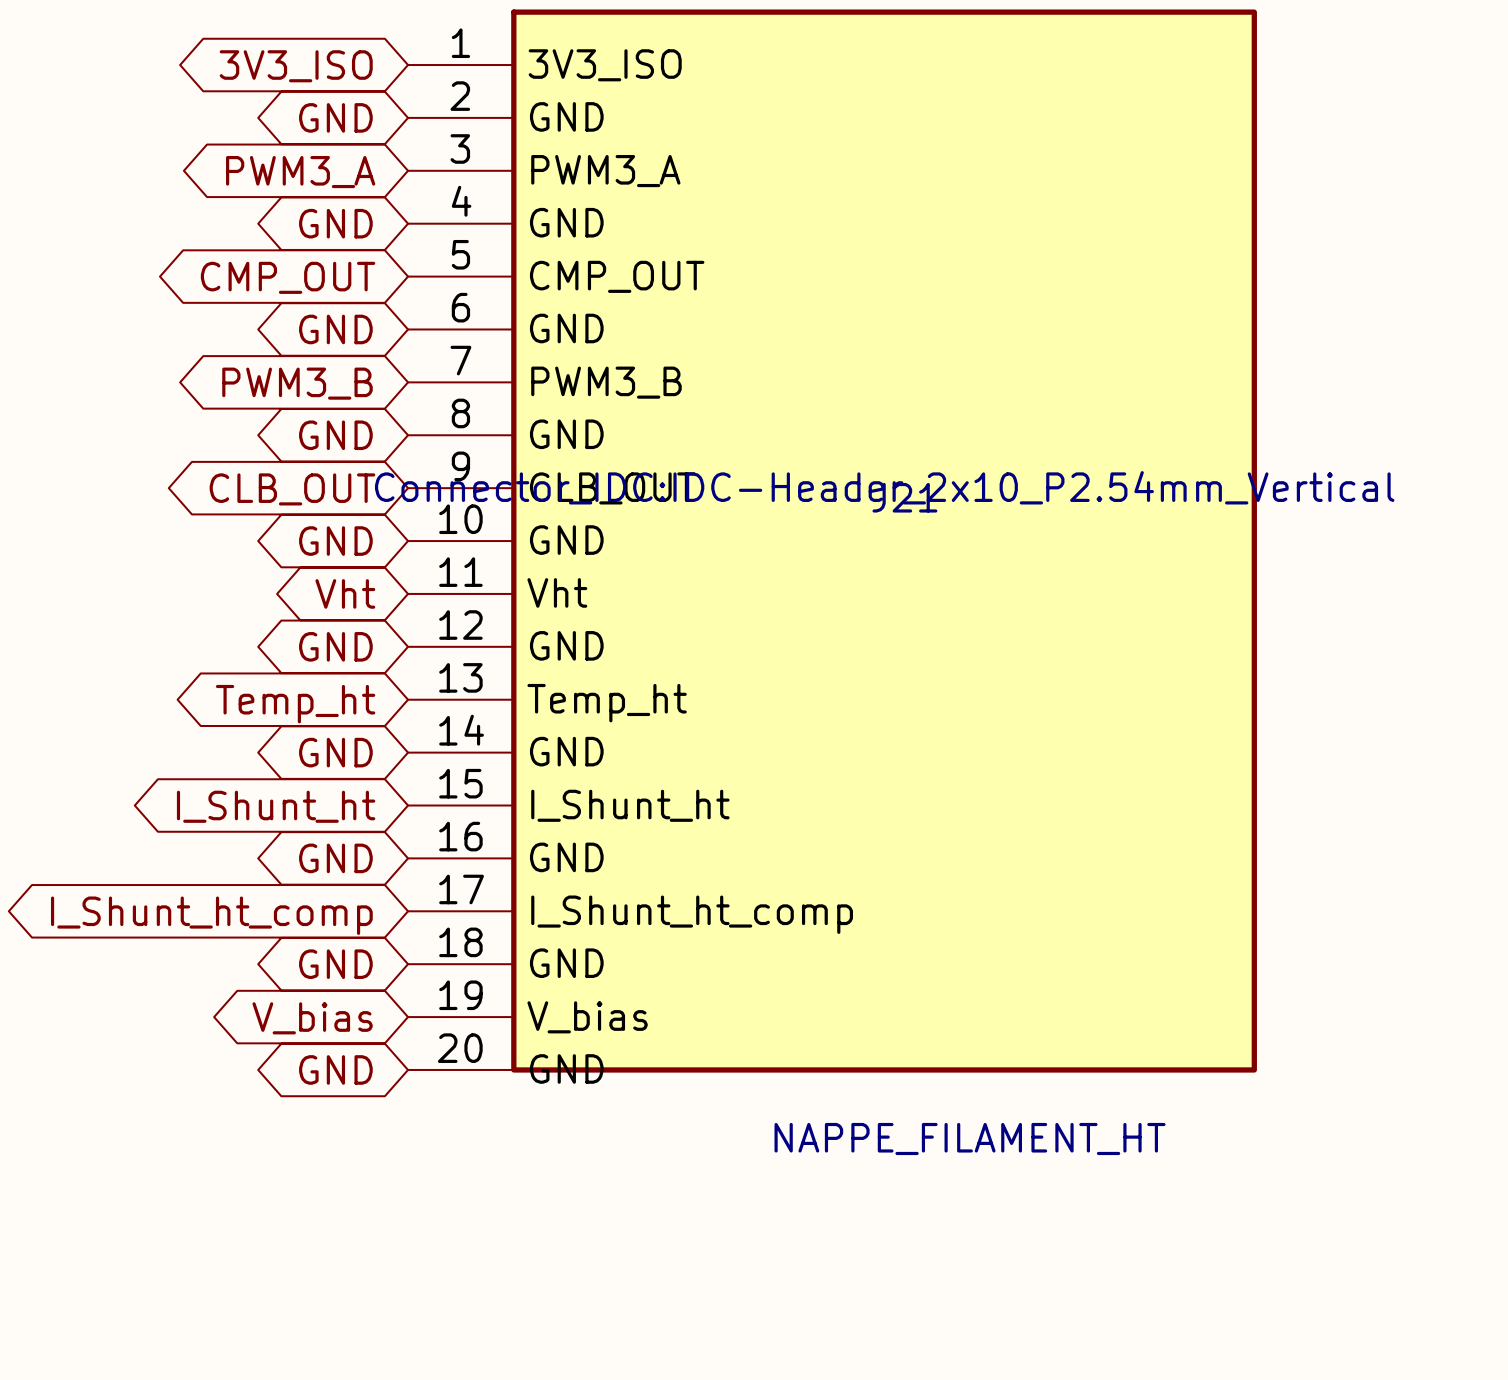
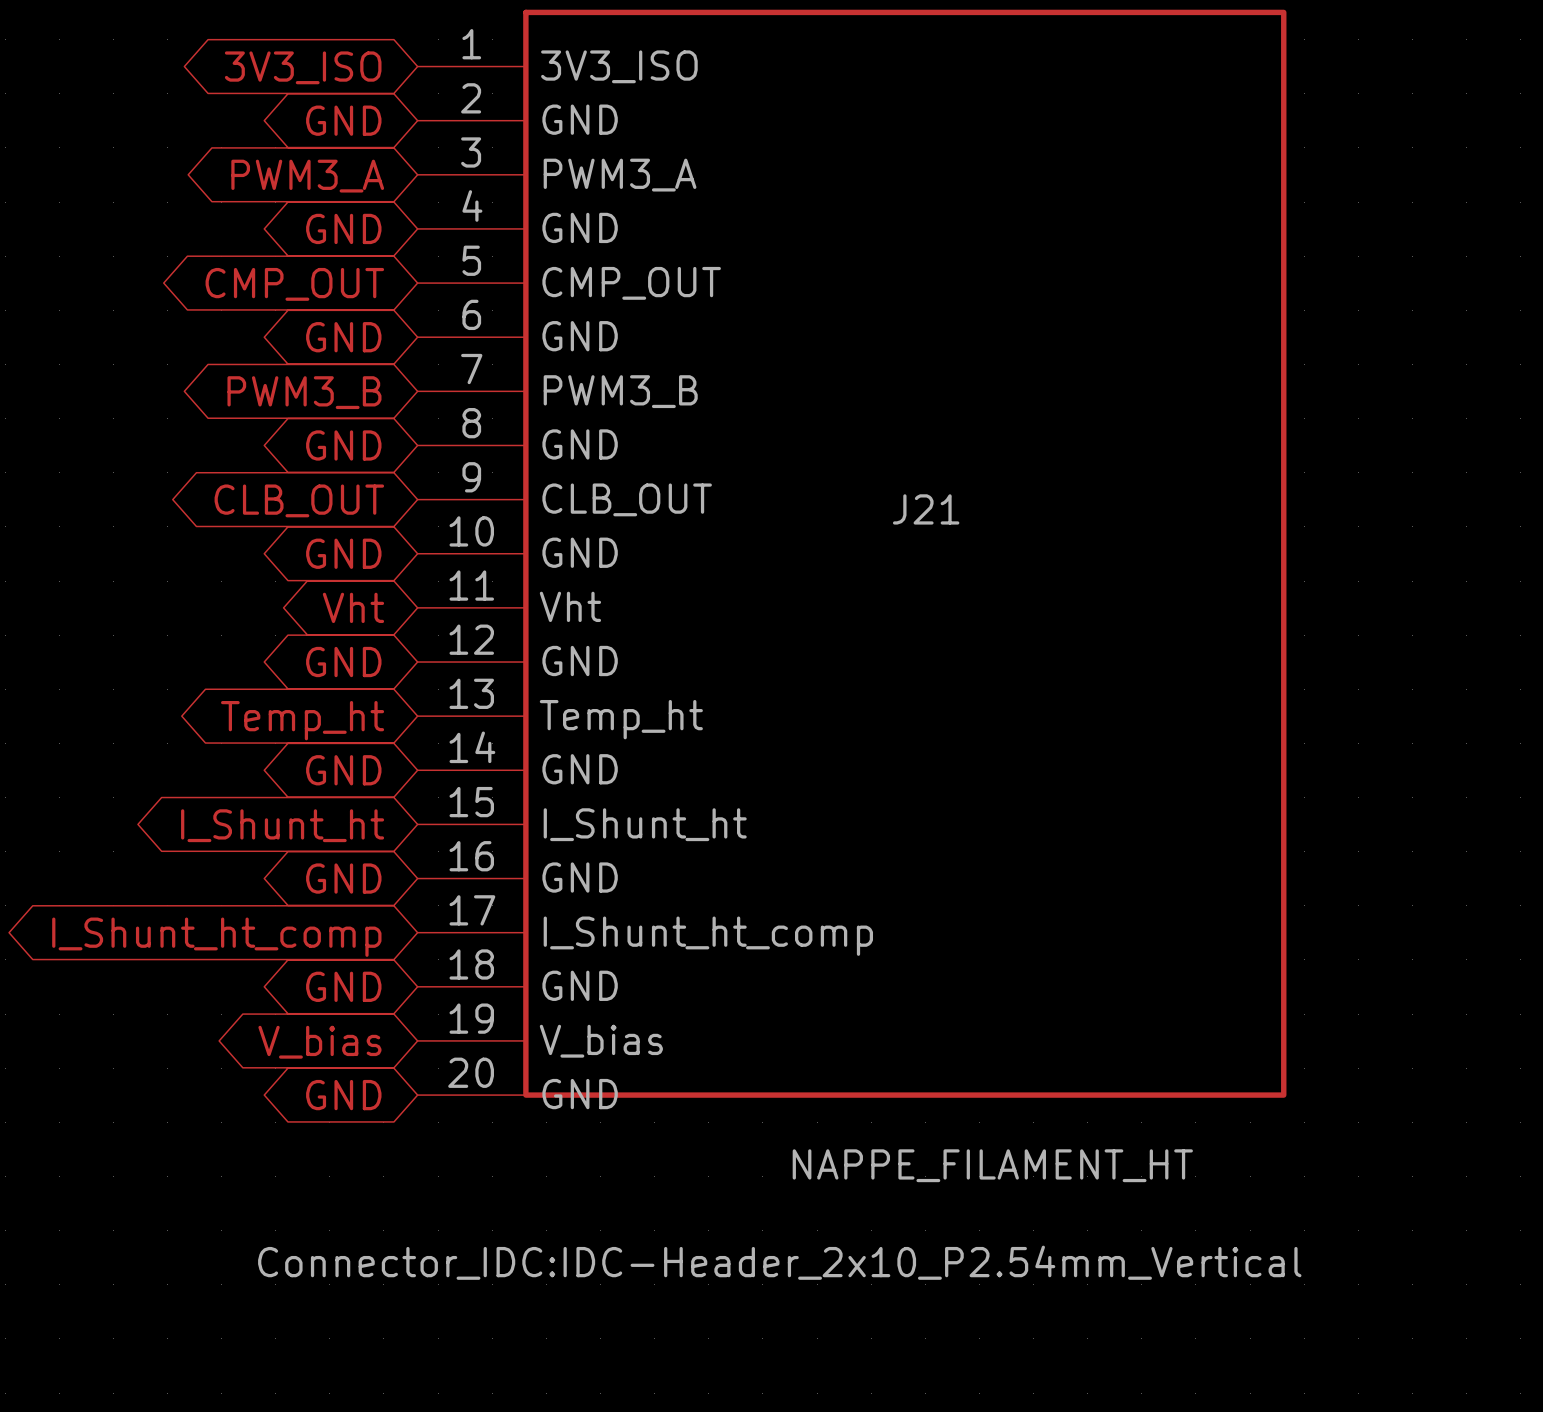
J21 text position: Connector_IDC:IDC-Header_2x10_P2.54mm_Vertical (884, 487) -> Connector_IDC:IDC-Header_2x10_P2.54mm_Vertical (779, 1262)

